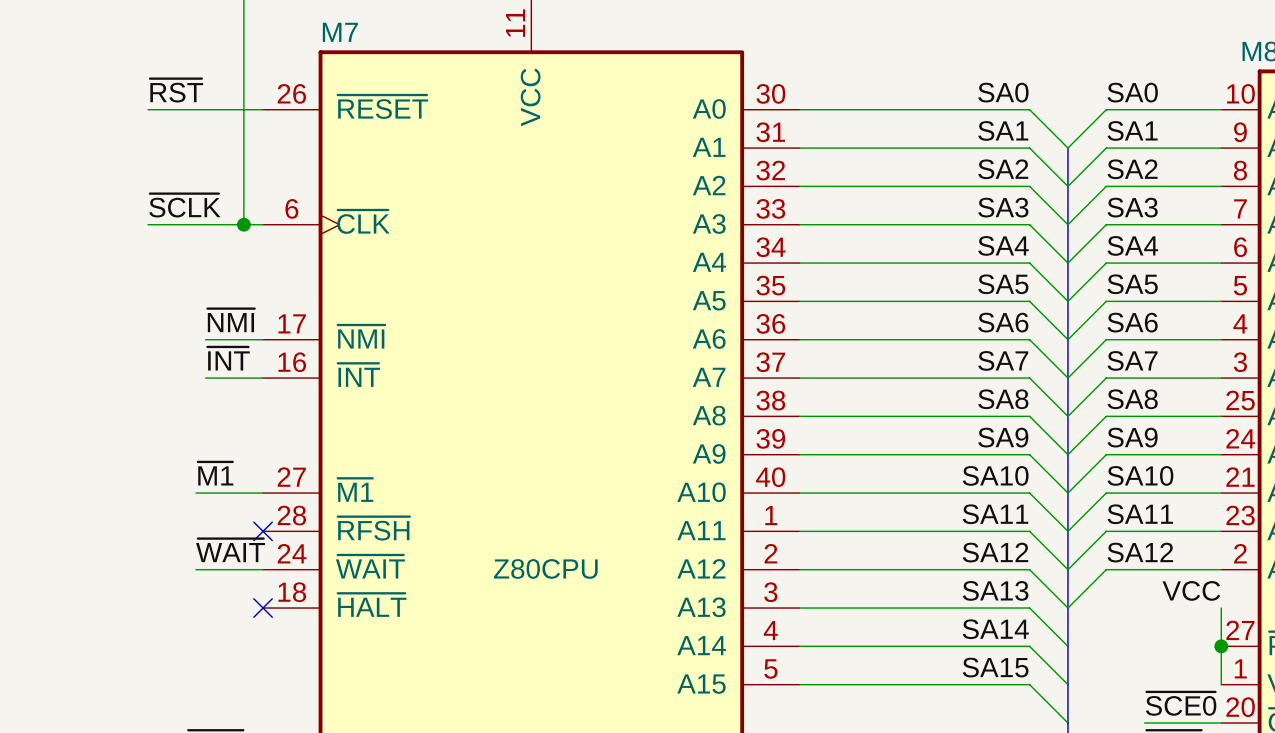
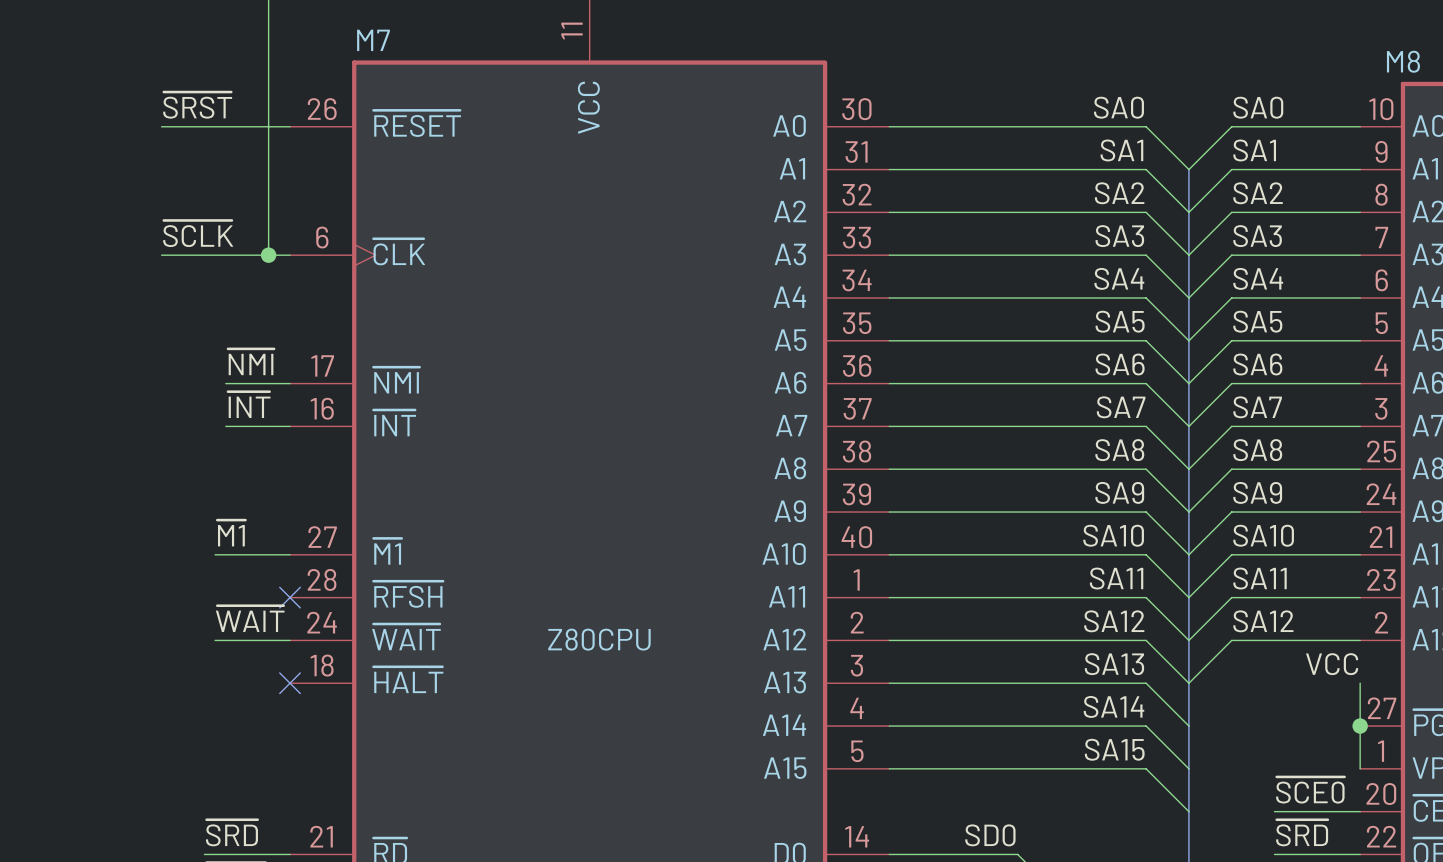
label: ~{RST} (176, 90) -> ~{SRST} (197, 105)

